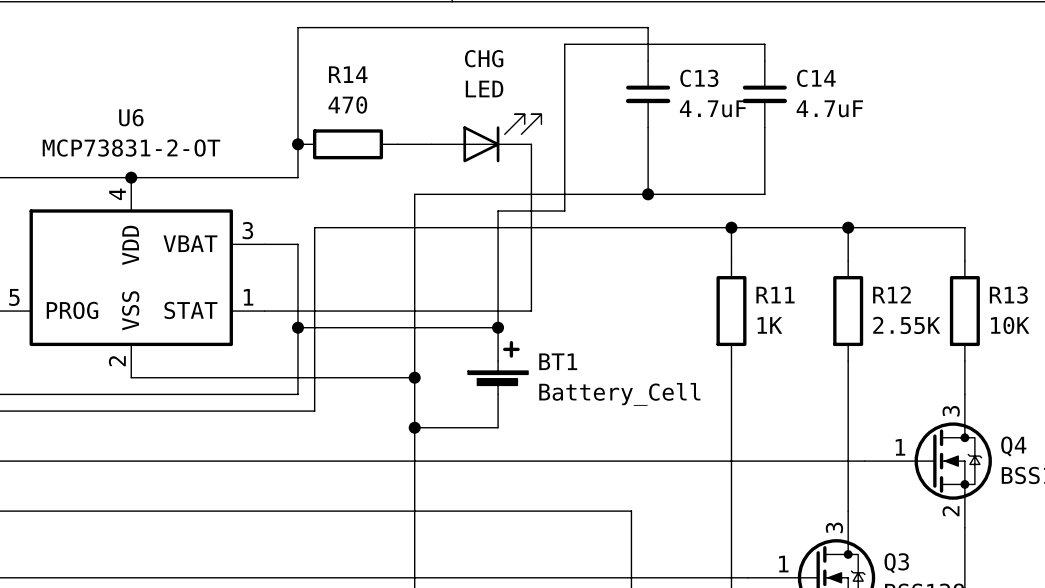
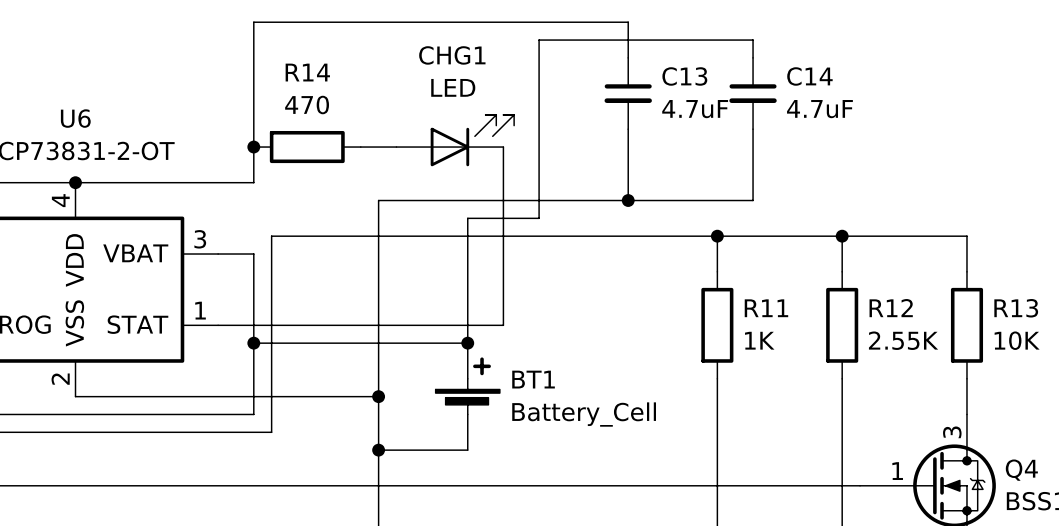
CHG name: CHG (484, 58) -> CHG1 (452, 55)

